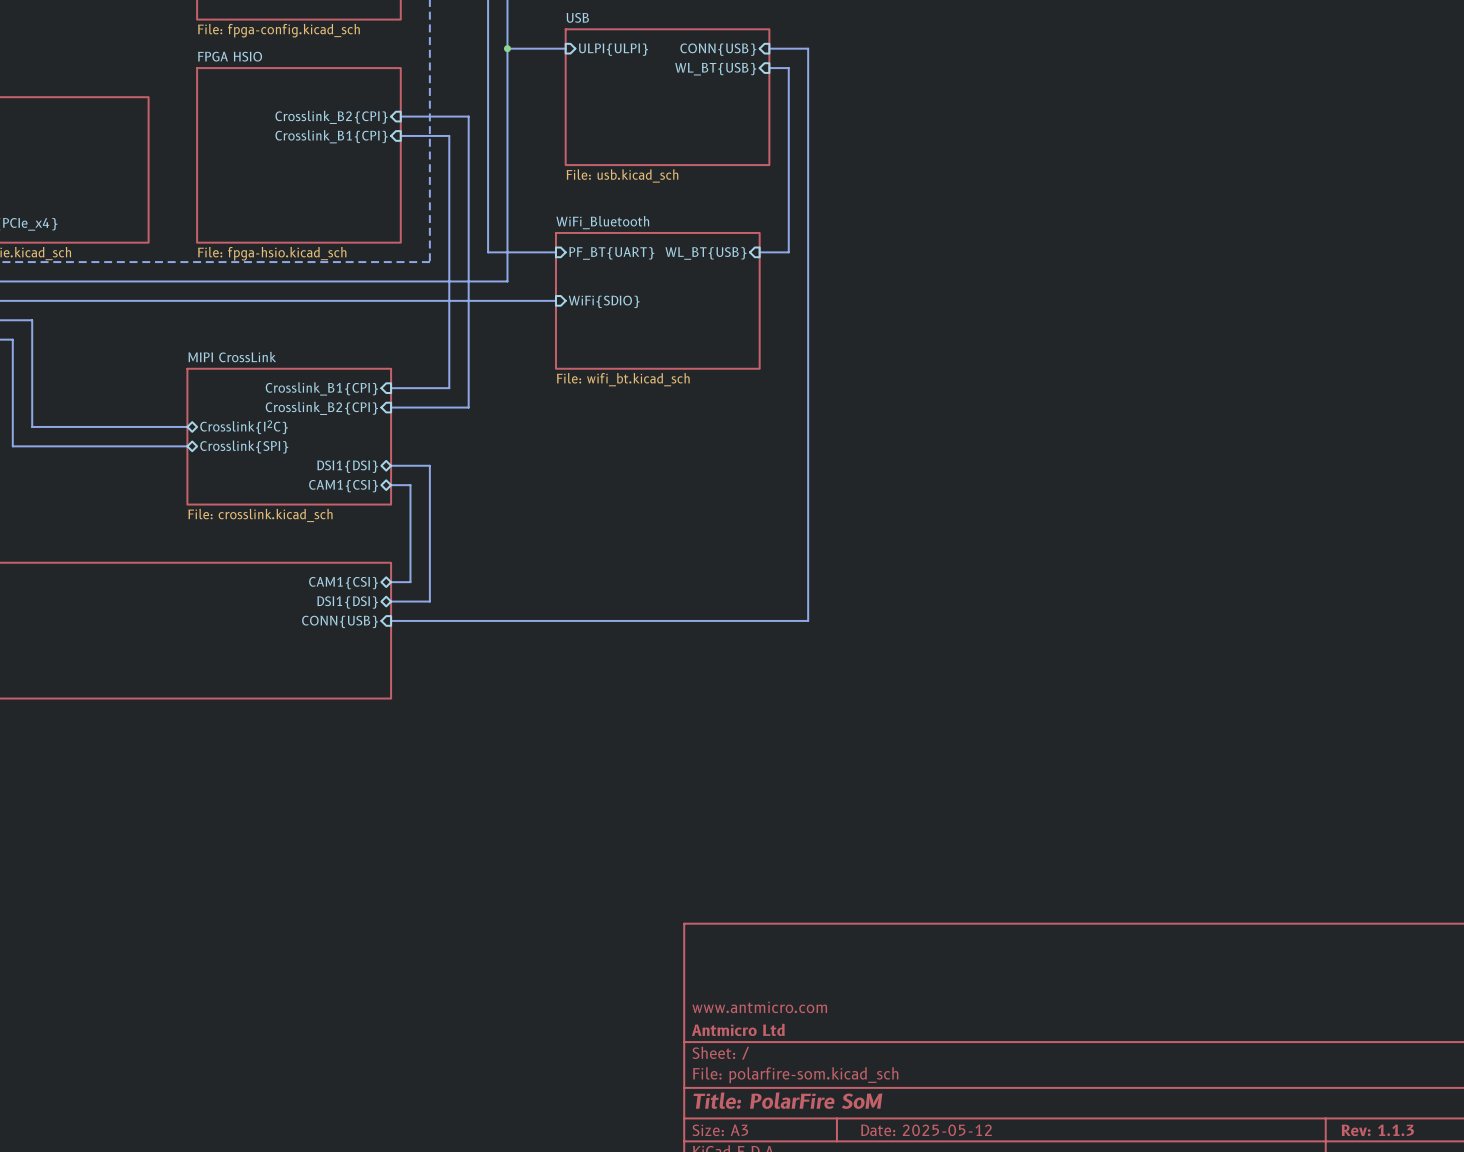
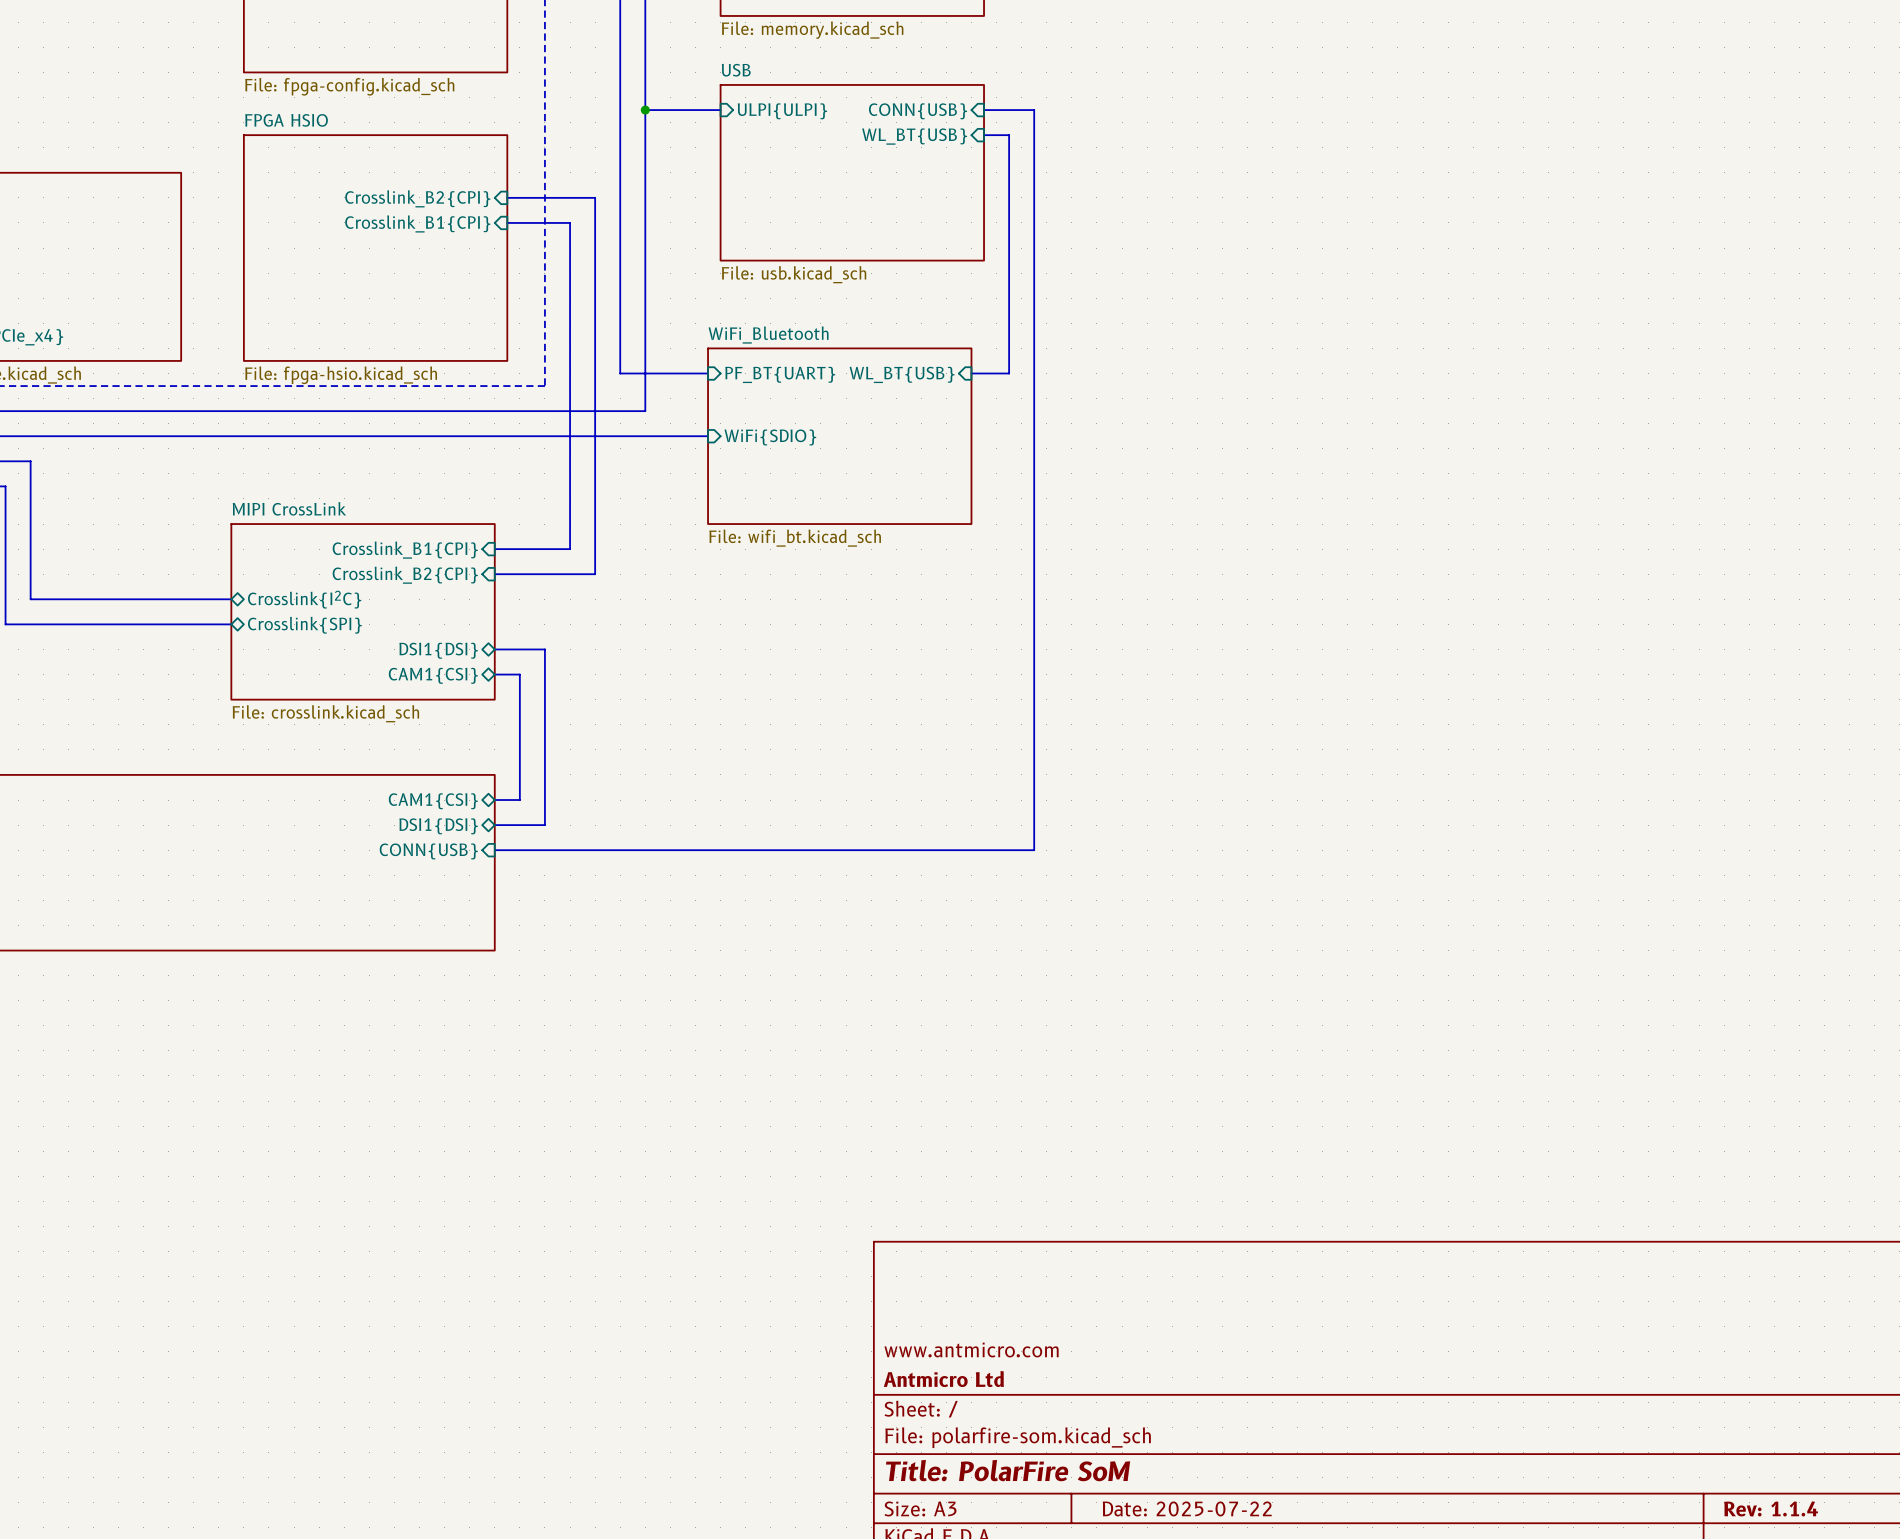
title block: Date: 2025-05-12 (926, 1130) -> Date: 2025-07-22 (1187, 1508)
title block: Rev: 1.1.3 (1377, 1130) -> Rev: 1.1.4 (1771, 1508)

